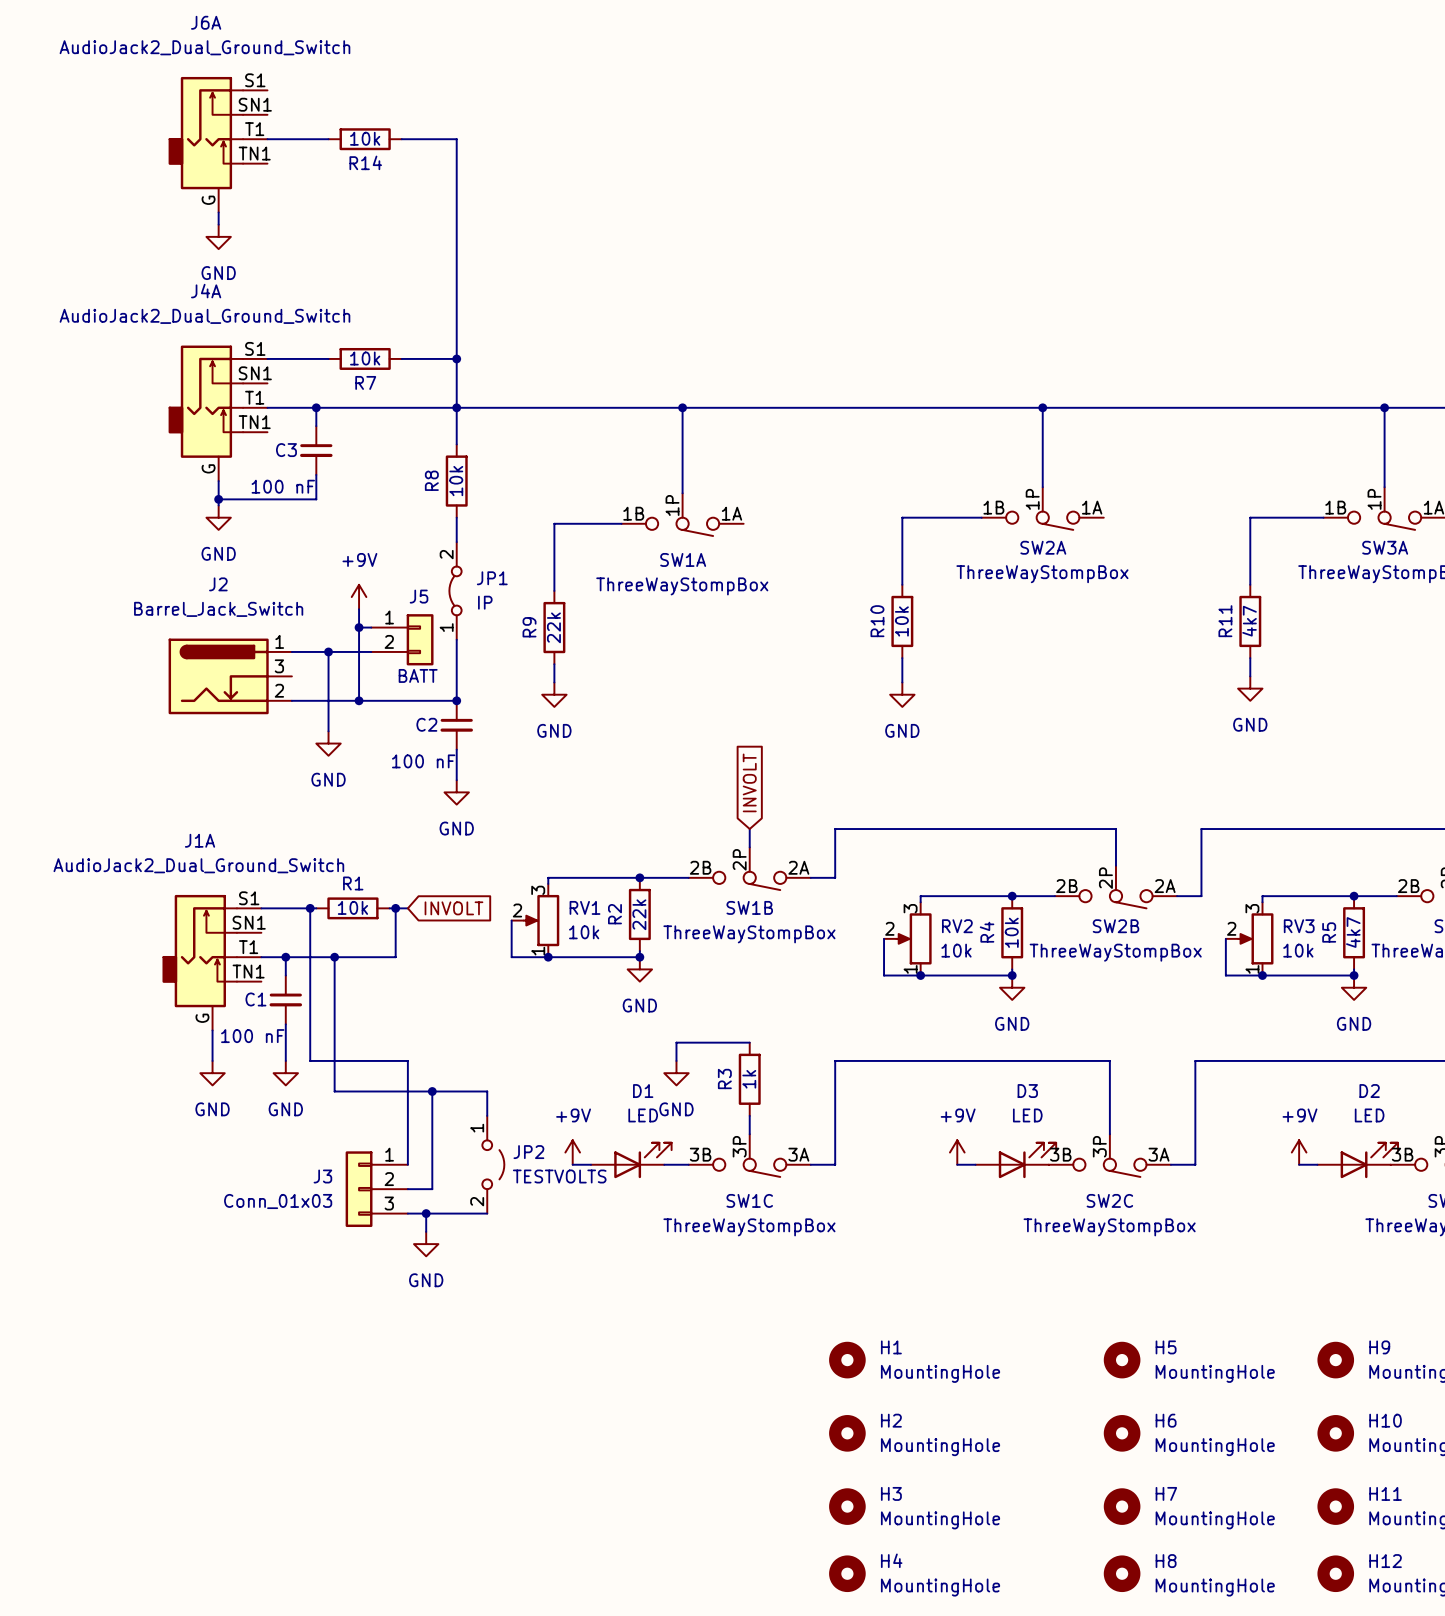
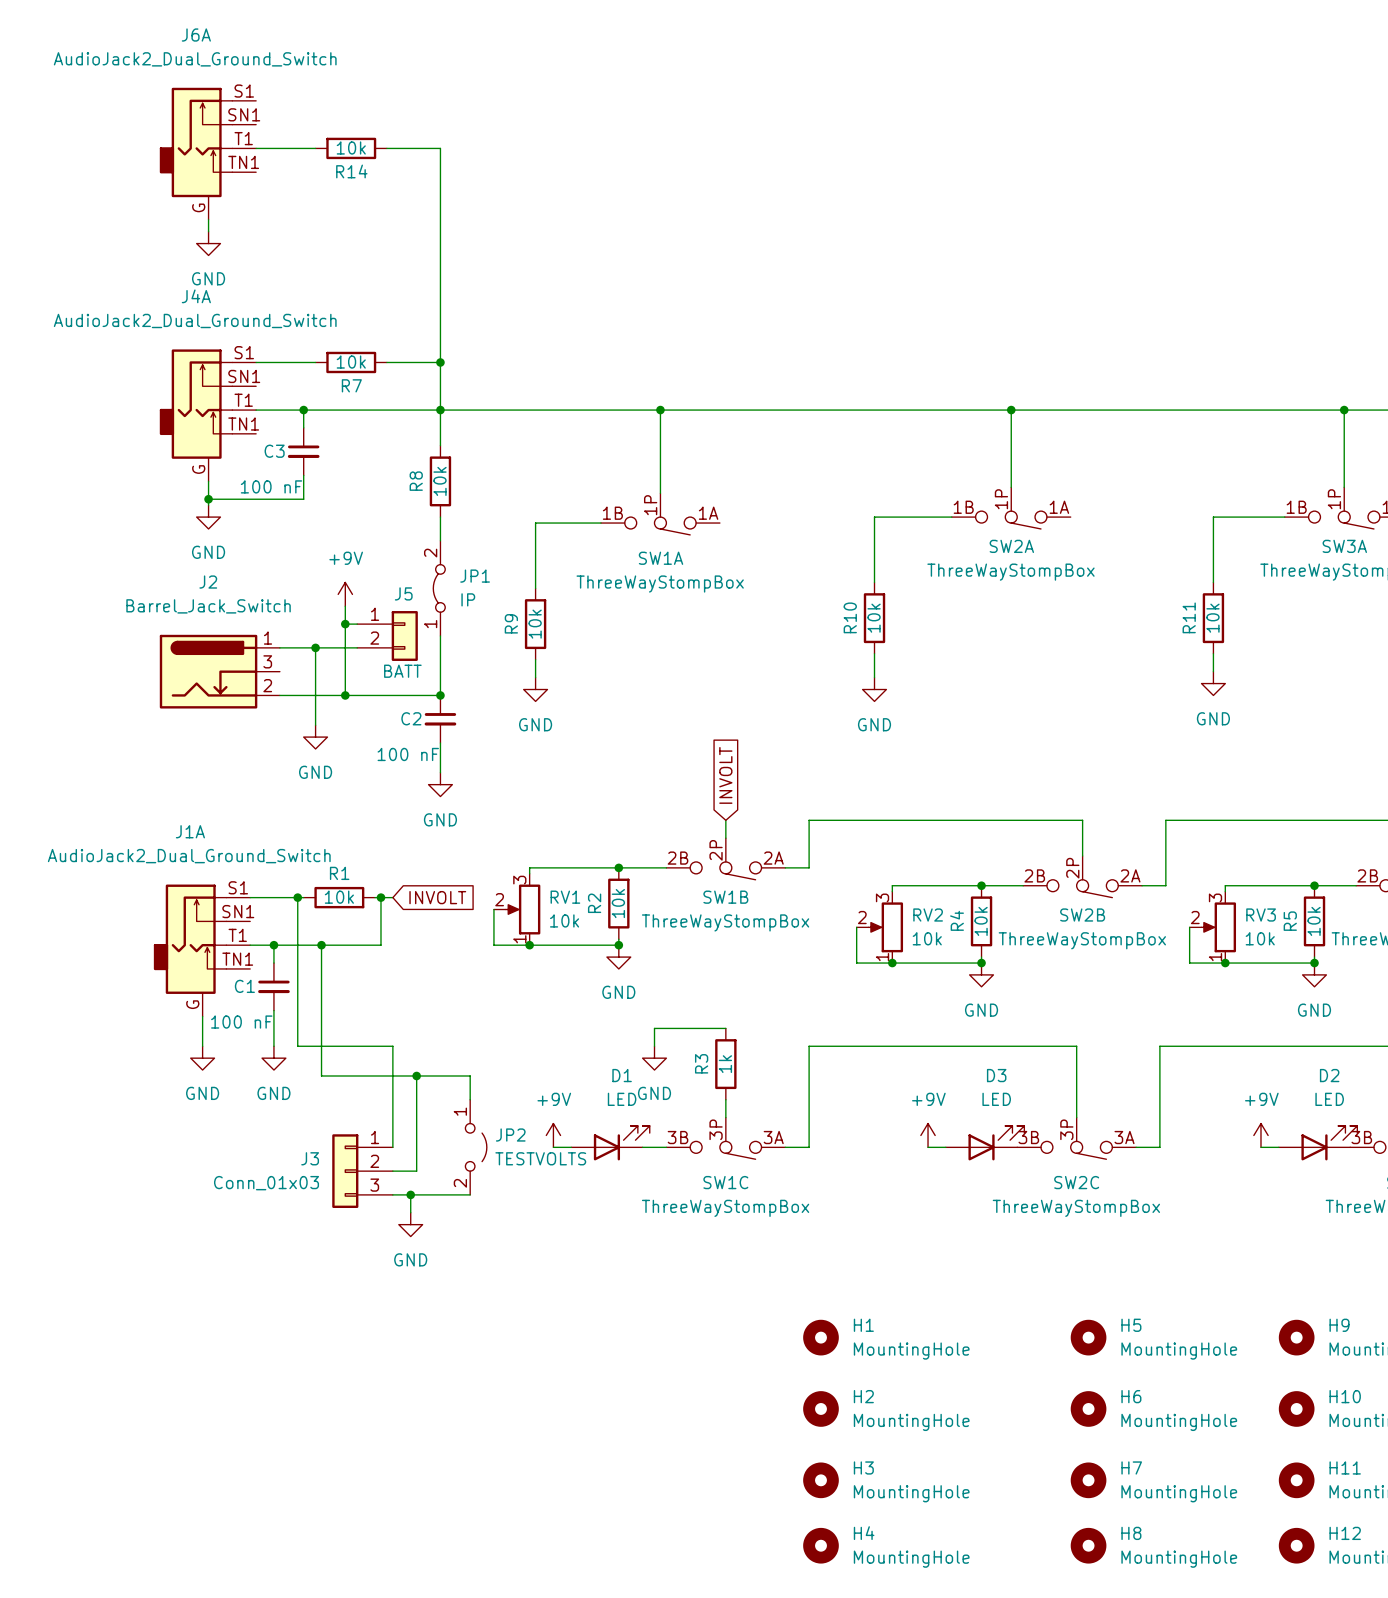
R11 value: 4k7 (1249, 621) -> 10k (1212, 618)
R9 value: 22k (553, 627) -> 10k (535, 624)
R2 value: 22k (639, 914) -> 10k (618, 903)
R5 value: 4k7 (1353, 932) -> 10k (1314, 921)

